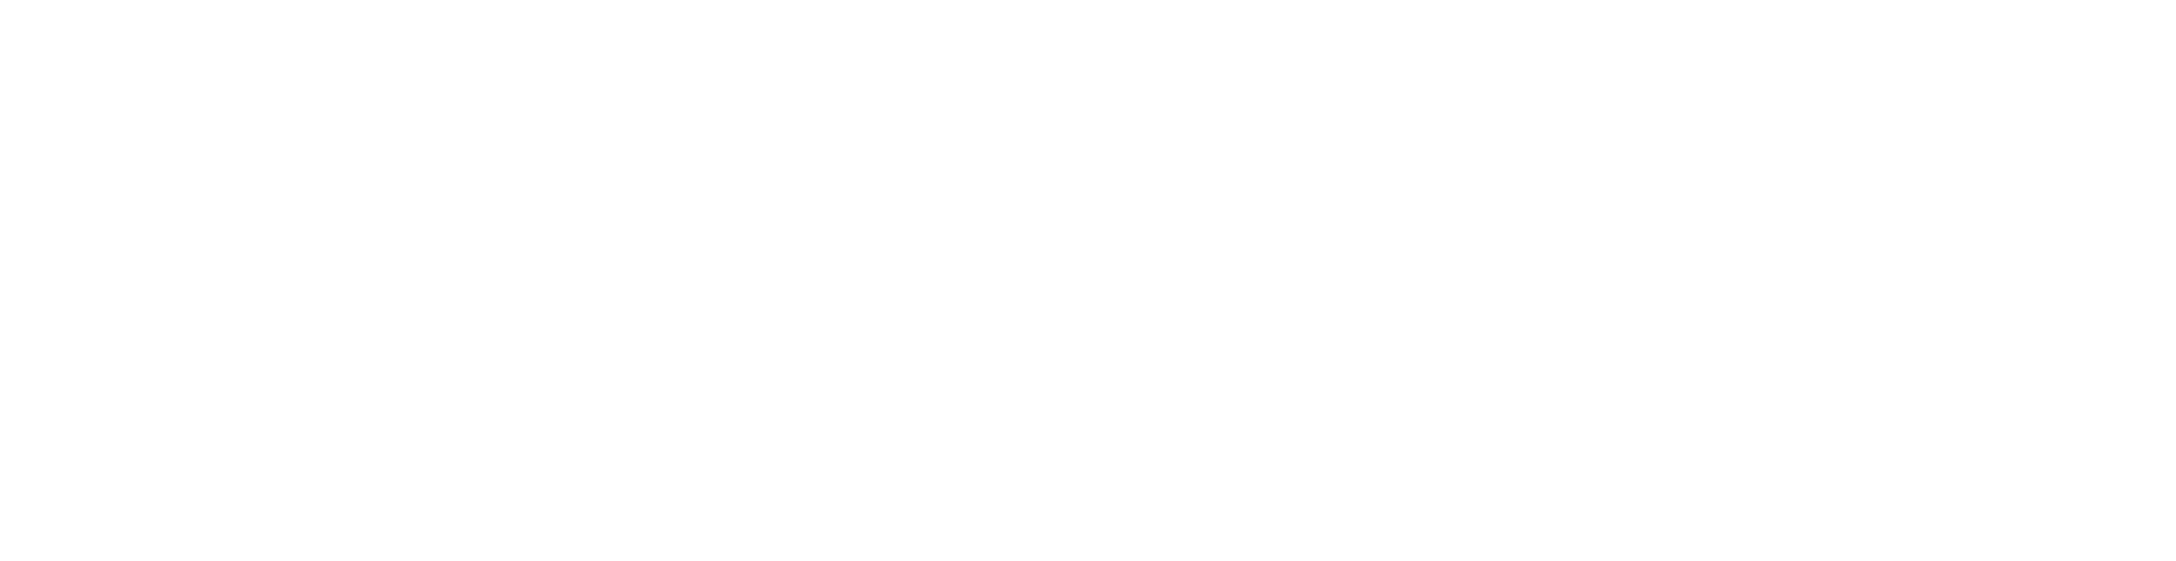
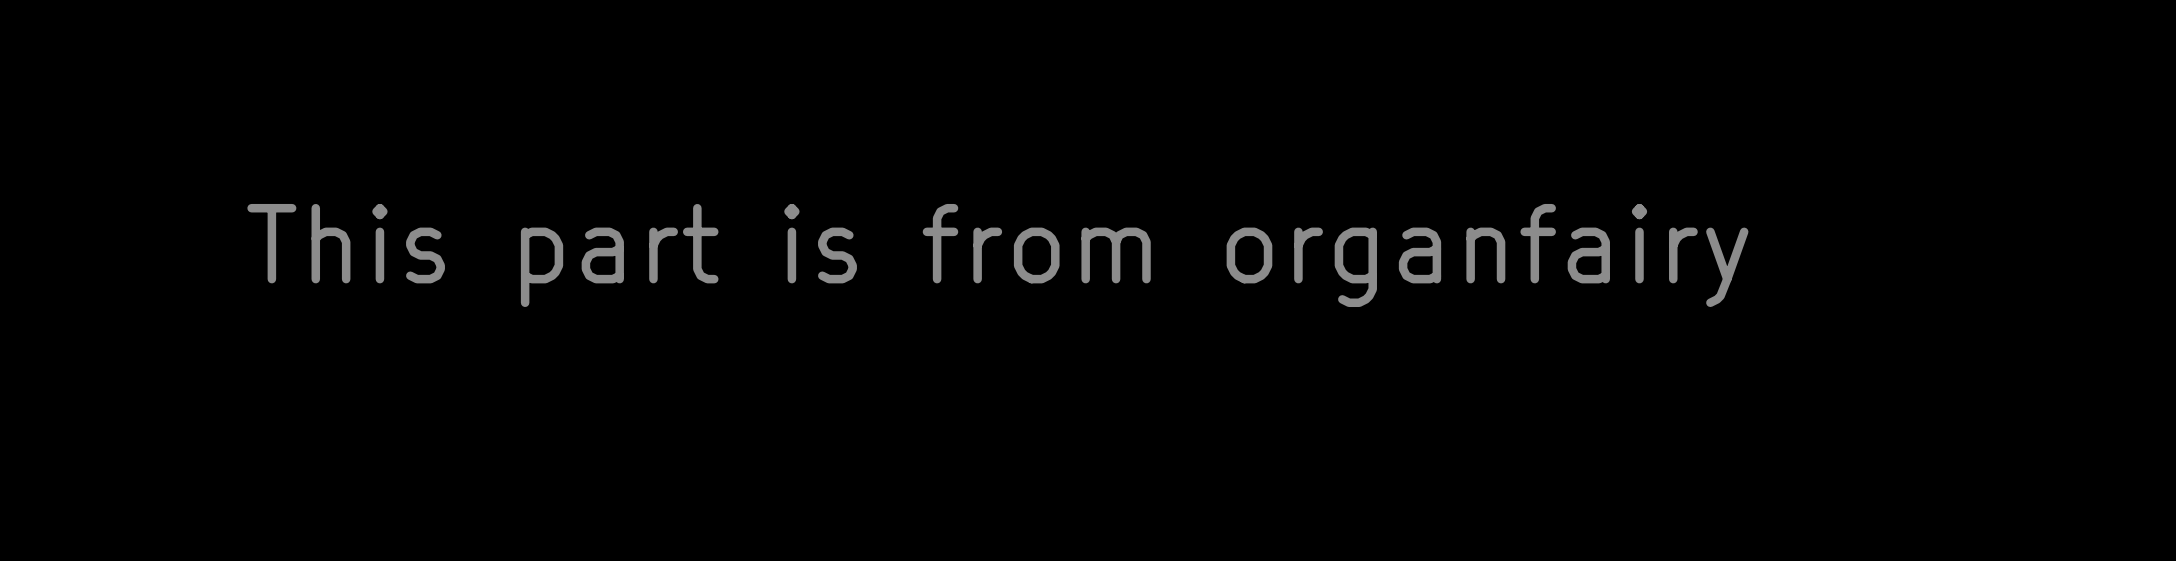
text: none -> This part is from organfairy (997, 255)

